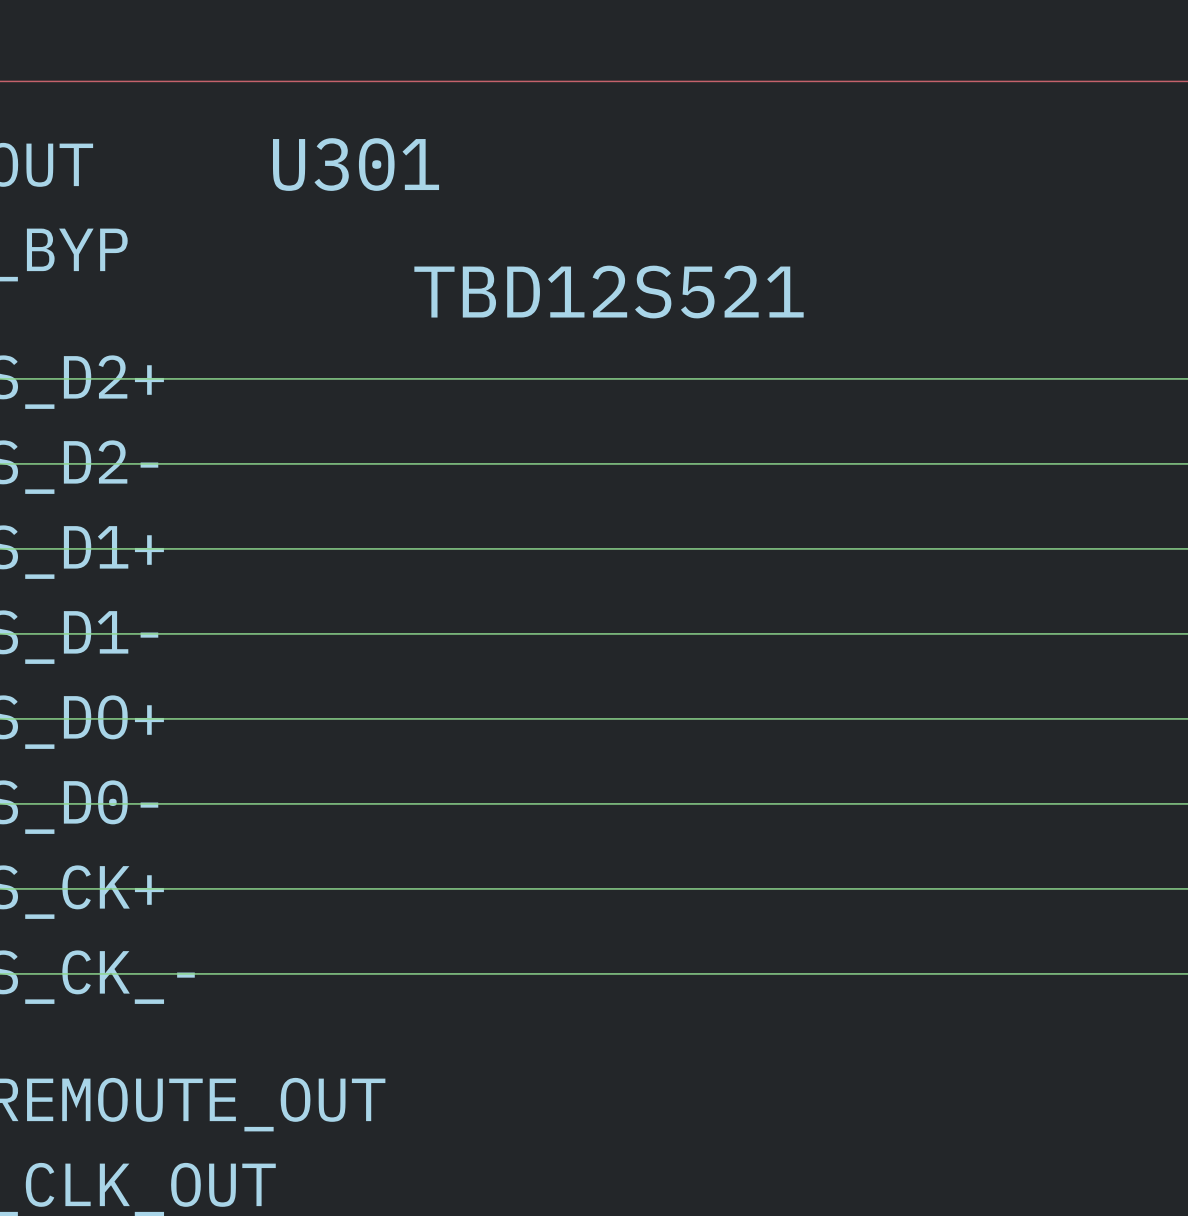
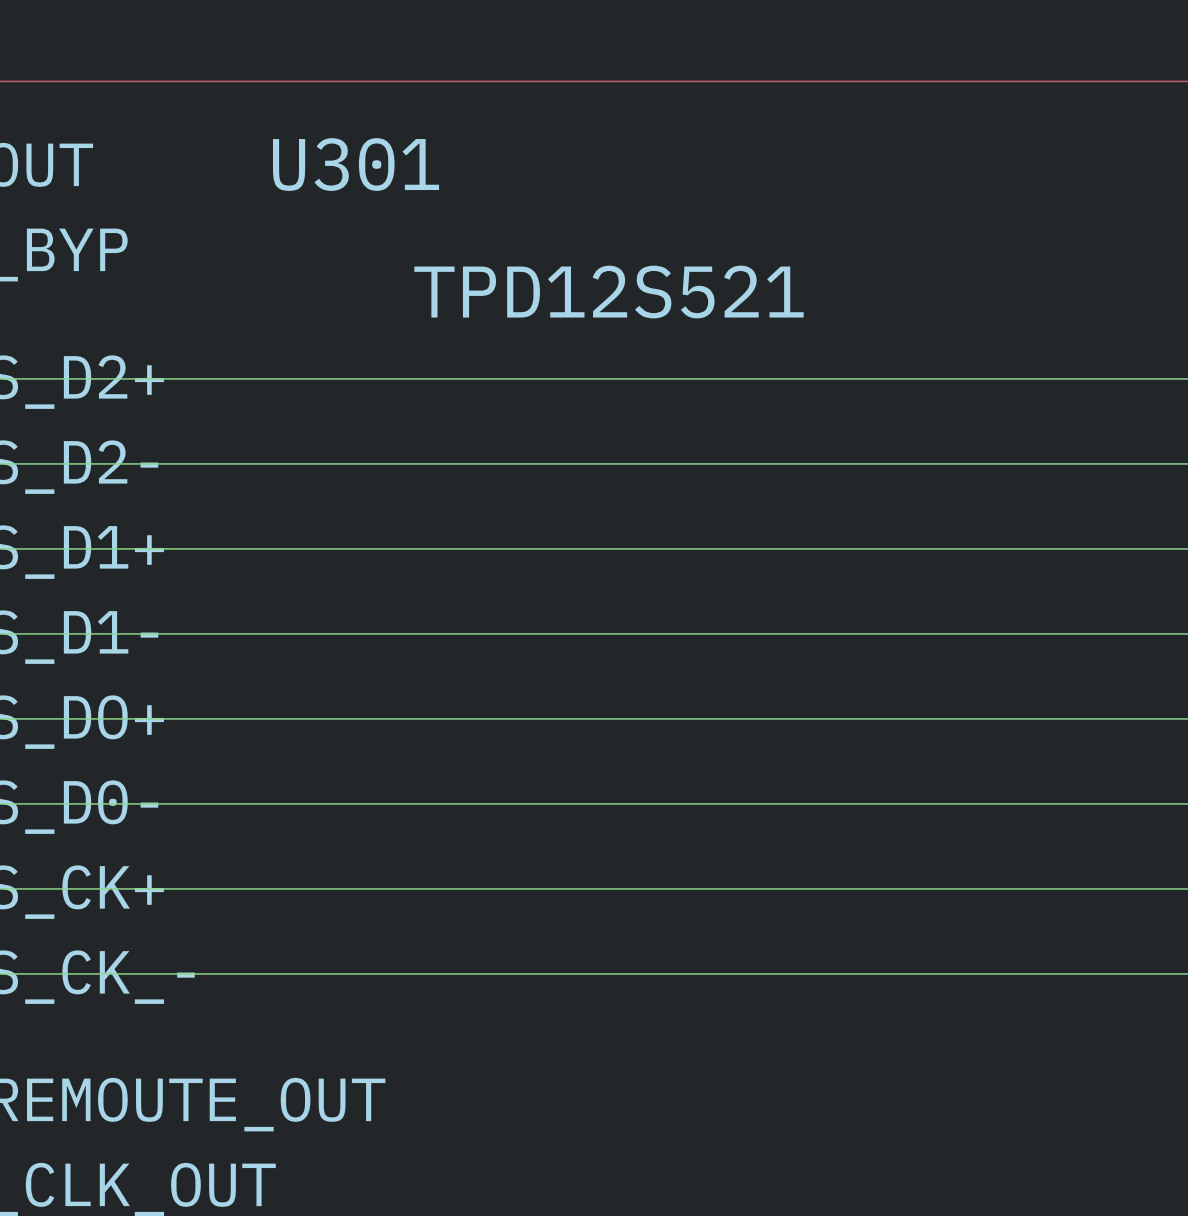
U301 value: TBD12S521 (609, 292) -> TPD12S521 (609, 292)

